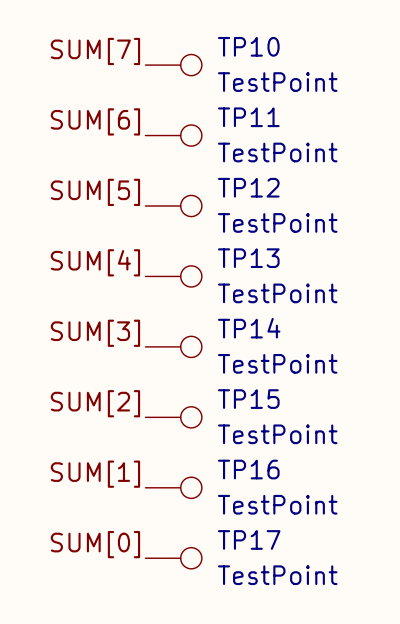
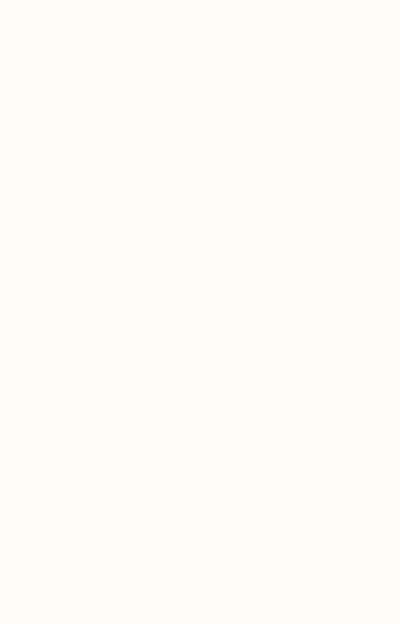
label: SUM[7] (95, 51) -> none
TP10: TestPoint (173, 65) -> none
label: SUM[6] (95, 121) -> none
TP11: TestPoint (173, 135) -> none
label: SUM[5] (95, 192) -> none
TP12: TestPoint (173, 205) -> none
label: SUM[4] (95, 262) -> none
TP13: TestPoint (173, 276) -> none
label: SUM[3] (95, 333) -> none
TP14: TestPoint (173, 346) -> none
label: SUM[2] (95, 403) -> none
TP15: TestPoint (173, 417) -> none
label: SUM[1] (95, 474) -> none
TP16: TestPoint (173, 487) -> none
label: SUM[0] (95, 544) -> none
TP17: TestPoint (173, 558) -> none

